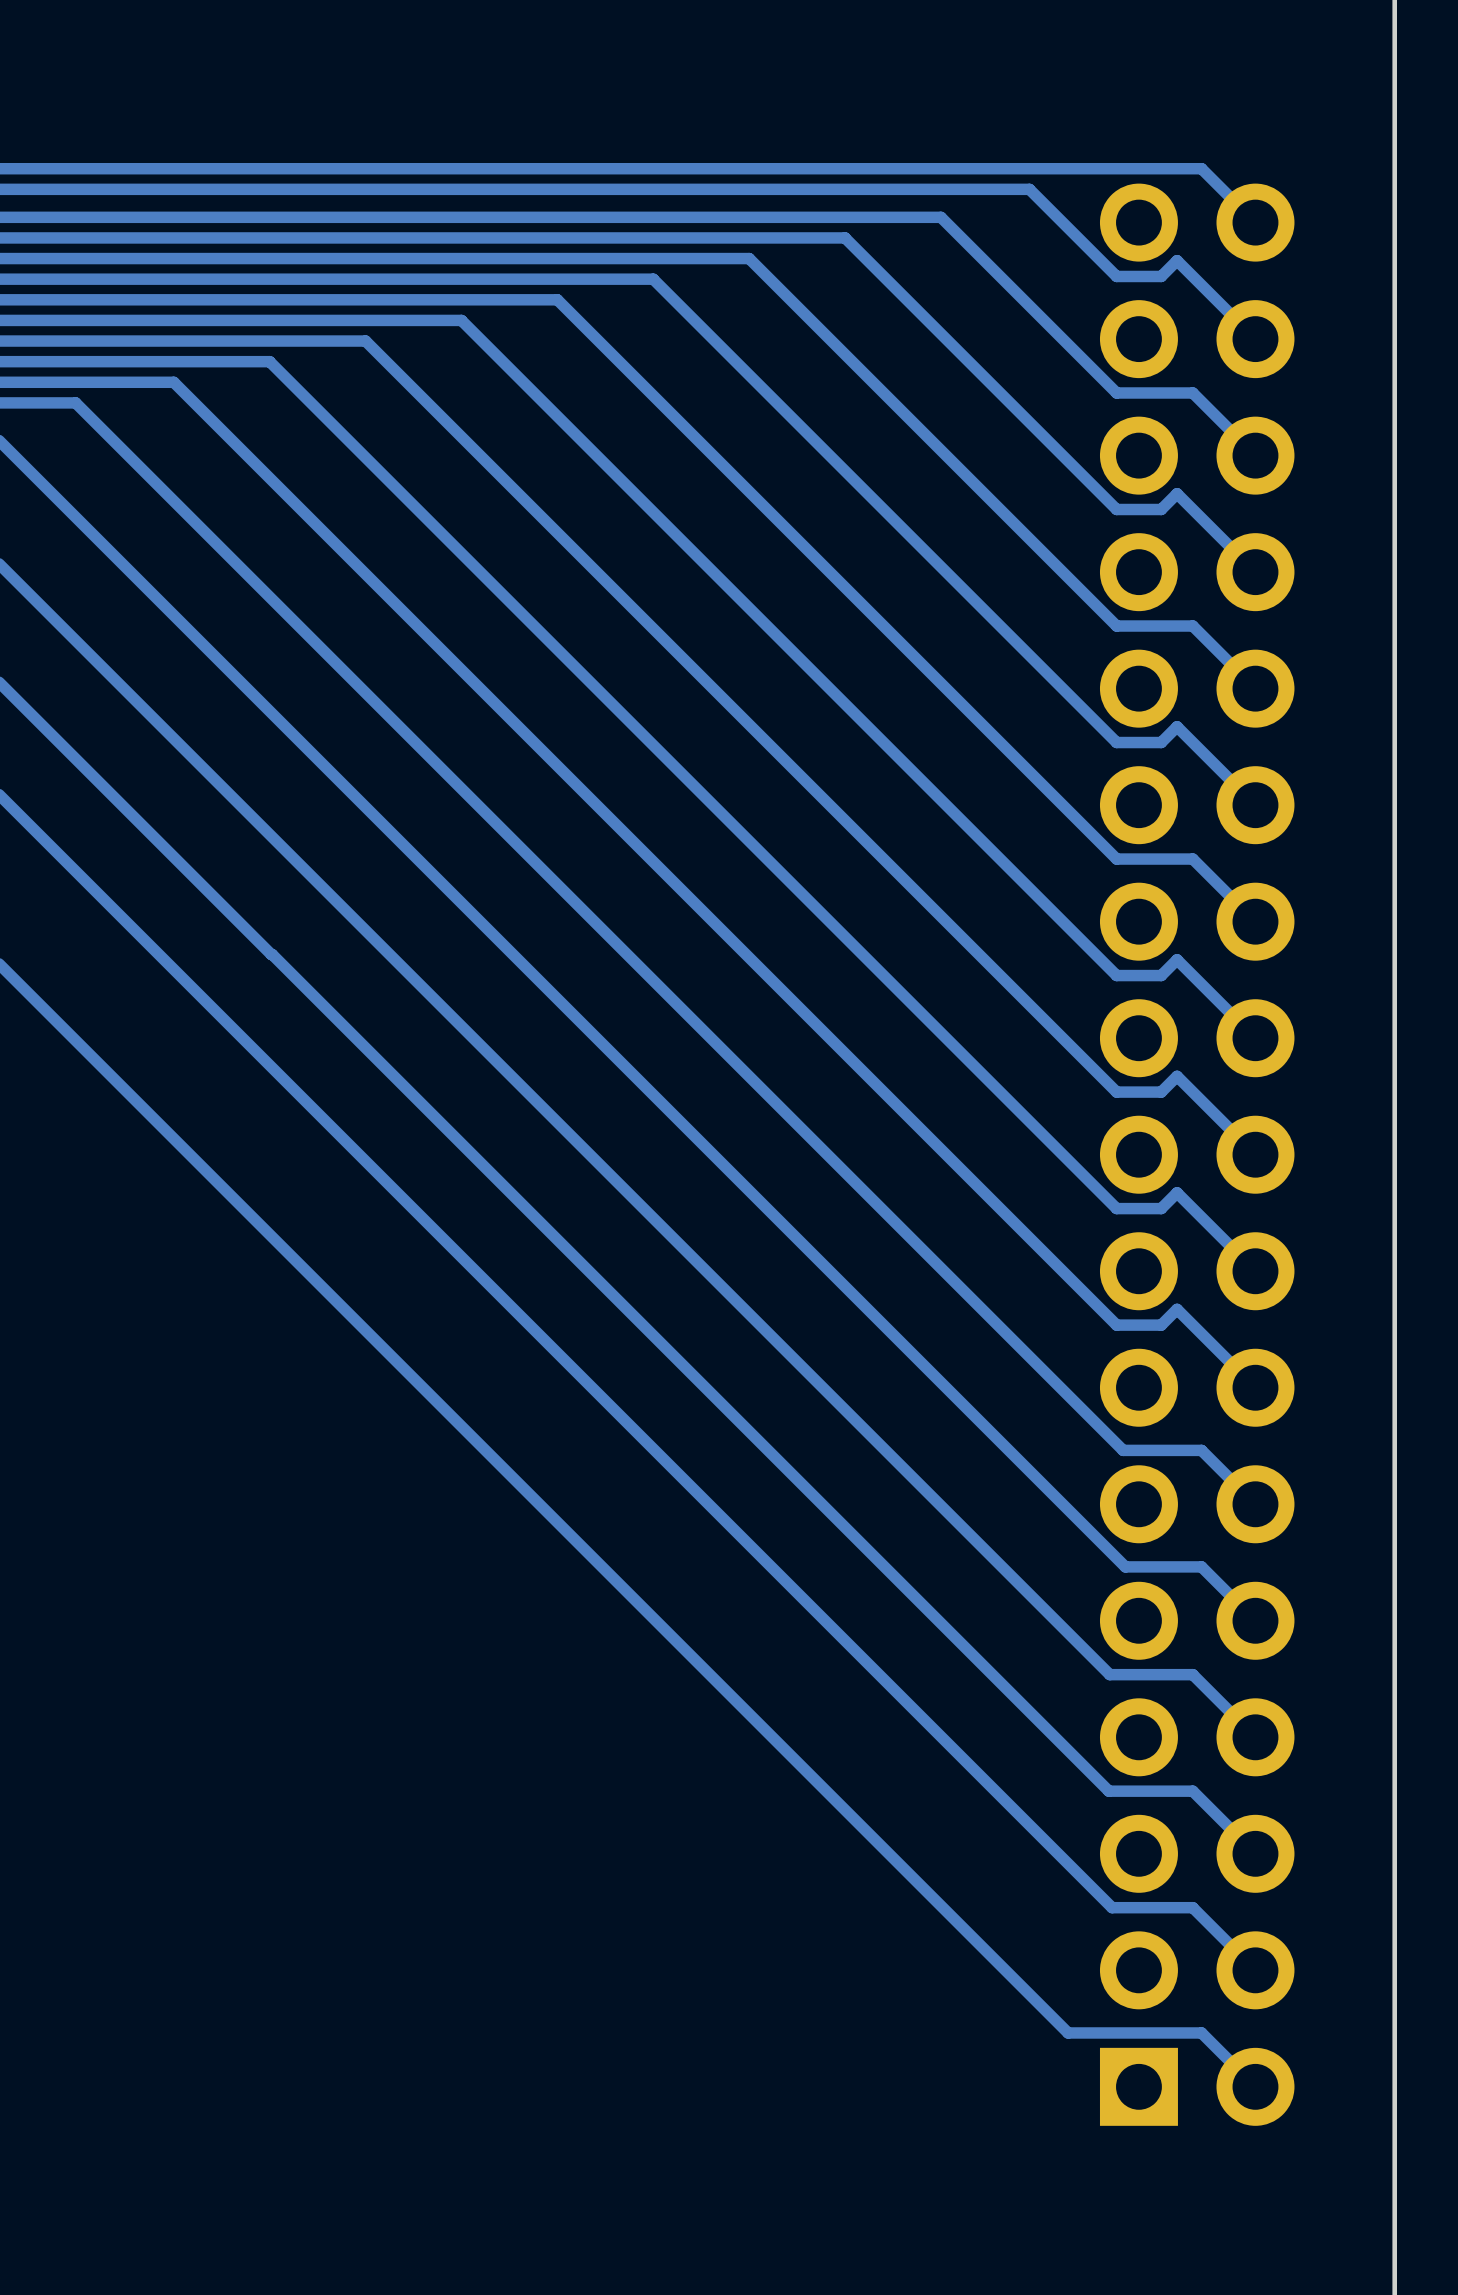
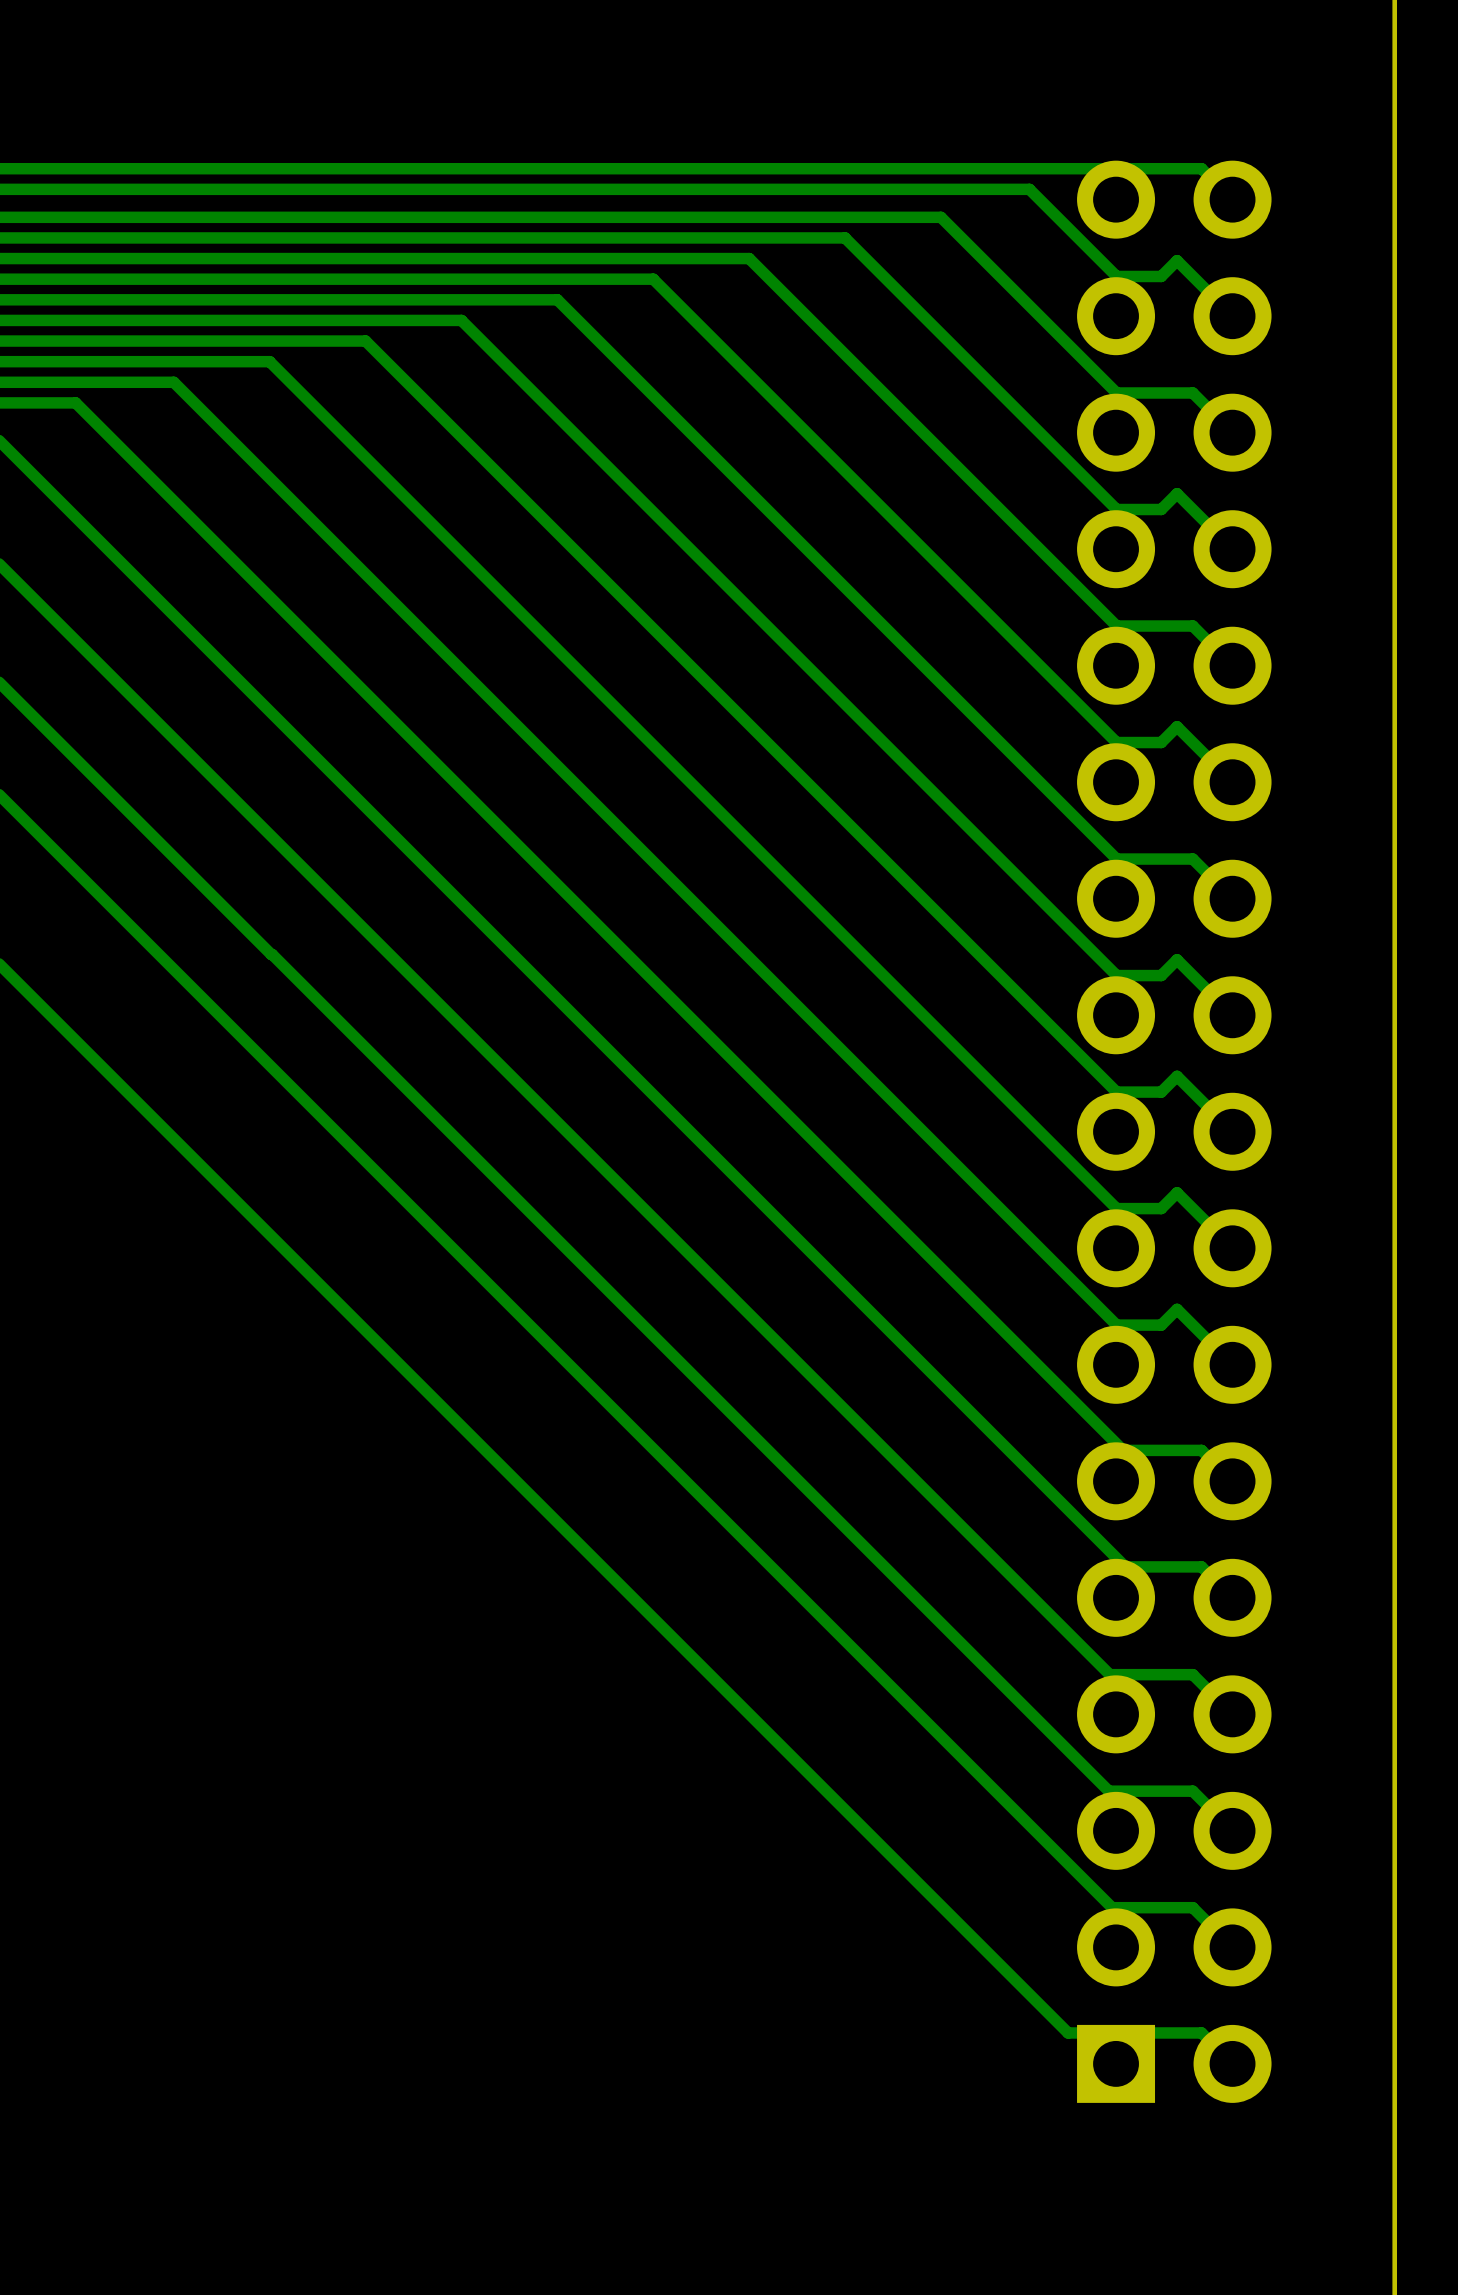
part position: (1197, 1154) -> (1174, 1131)

